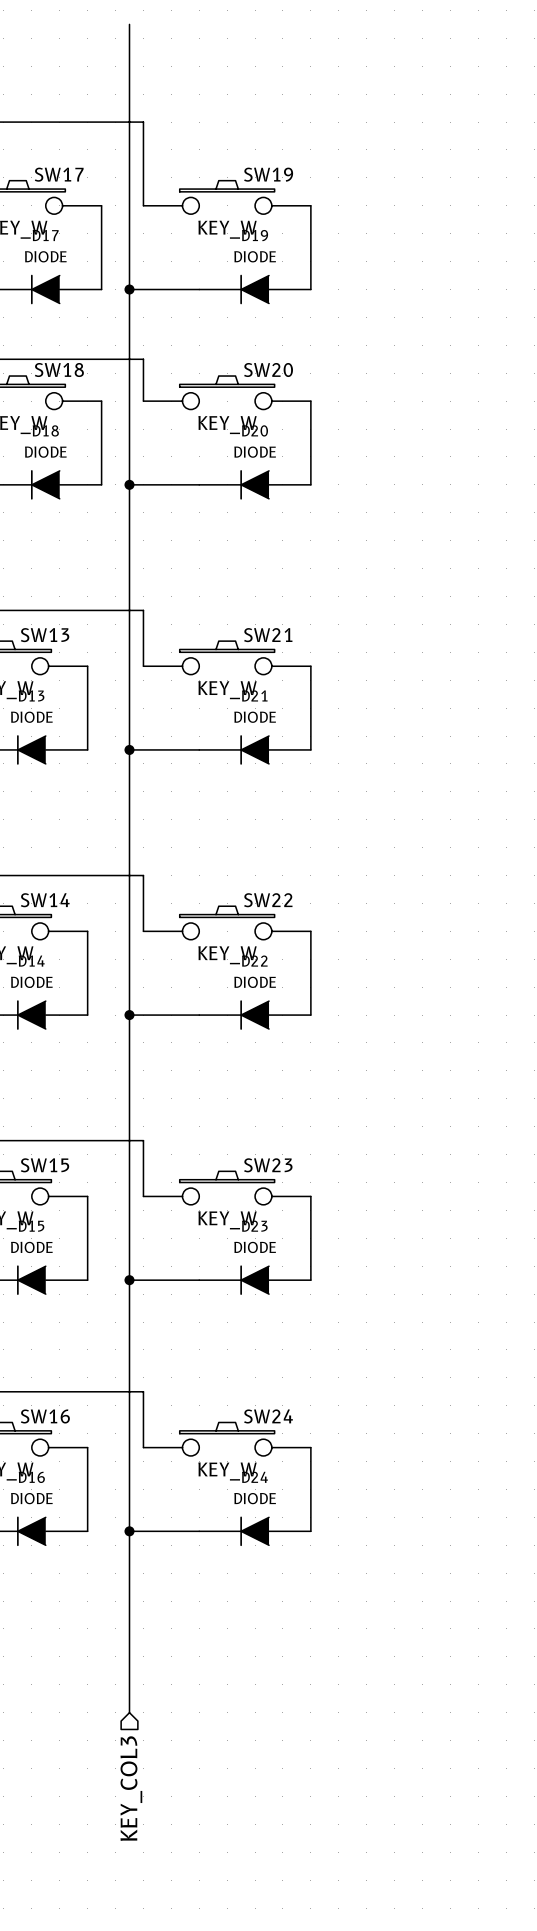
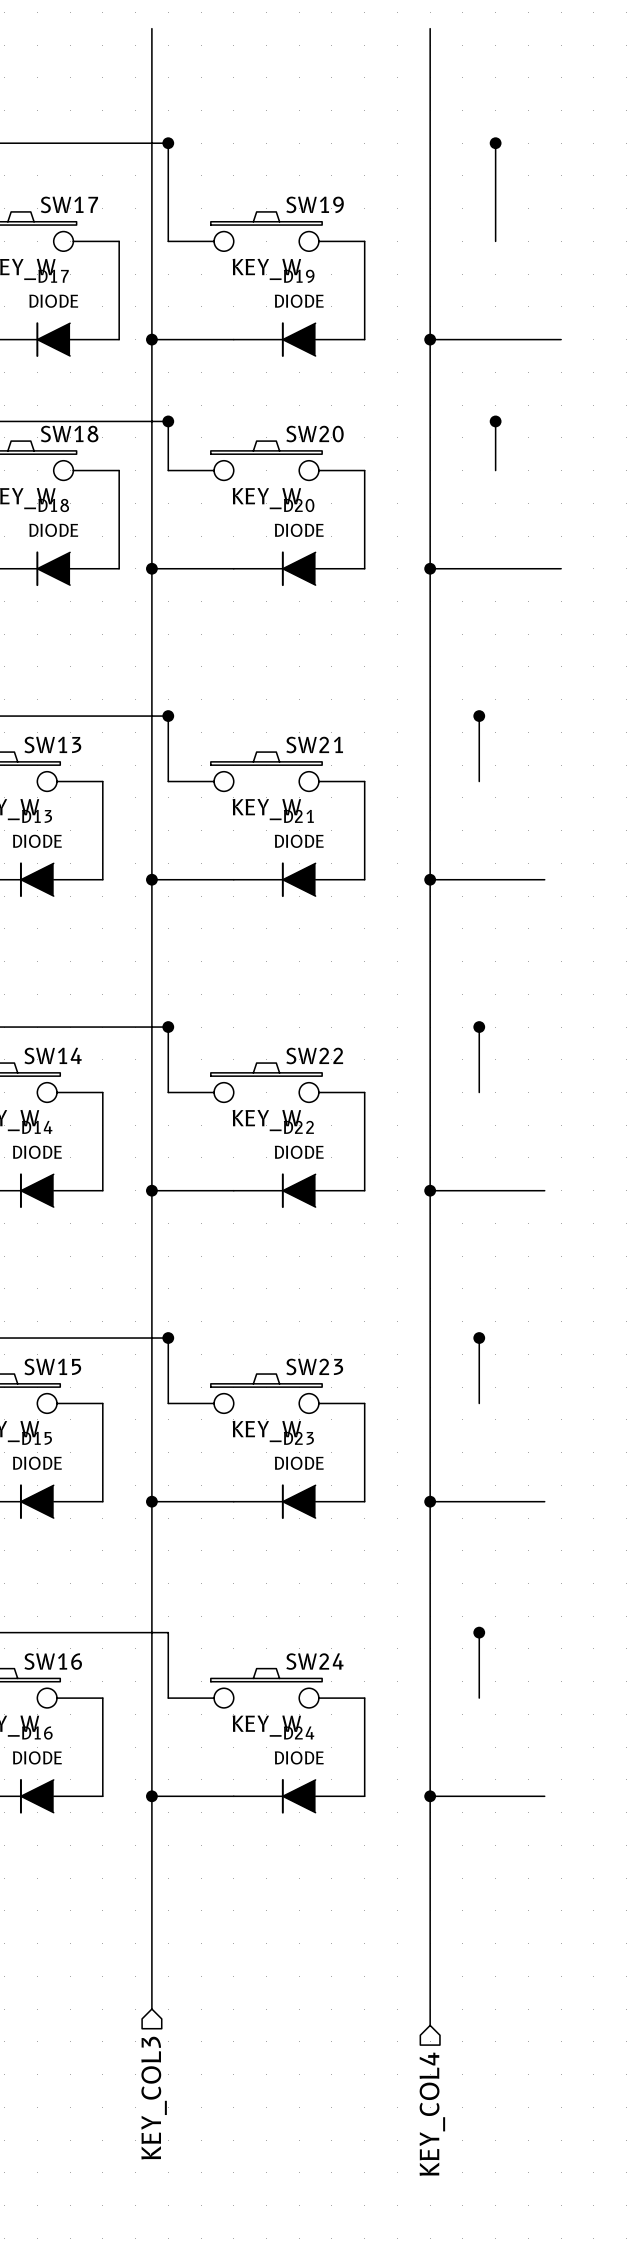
wire: none -> (430, 28) (430, 2025)
junction: none -> (168, 143)
wire: none -> (495, 143) (495, 241)
junction: none -> (495, 143)
wire: none -> (430, 339) (561, 339)
junction: none -> (430, 339)
junction: none -> (168, 421)
wire: none -> (495, 421) (495, 470)
junction: none -> (495, 421)
wire: none -> (430, 568) (561, 568)
junction: none -> (430, 568)
junction: none -> (168, 716)
wire: none -> (479, 716) (479, 781)
junction: none -> (479, 716)
wire: none -> (430, 879) (544, 879)
junction: none -> (430, 879)
junction: none -> (168, 1027)
wire: none -> (479, 1027) (479, 1092)
junction: none -> (479, 1027)
wire: none -> (430, 1190) (544, 1190)
junction: none -> (430, 1190)
junction: none -> (168, 1338)
wire: none -> (479, 1338) (479, 1403)
junction: none -> (479, 1338)
wire: none -> (430, 1501) (544, 1501)
junction: none -> (430, 1501)
wire: none -> (479, 1632) (479, 1698)
junction: none -> (479, 1632)
wire: none -> (430, 1796) (544, 1796)
junction: none -> (430, 1796)
hierarchical label: none -> KEY_COL4 (432, 2114)

